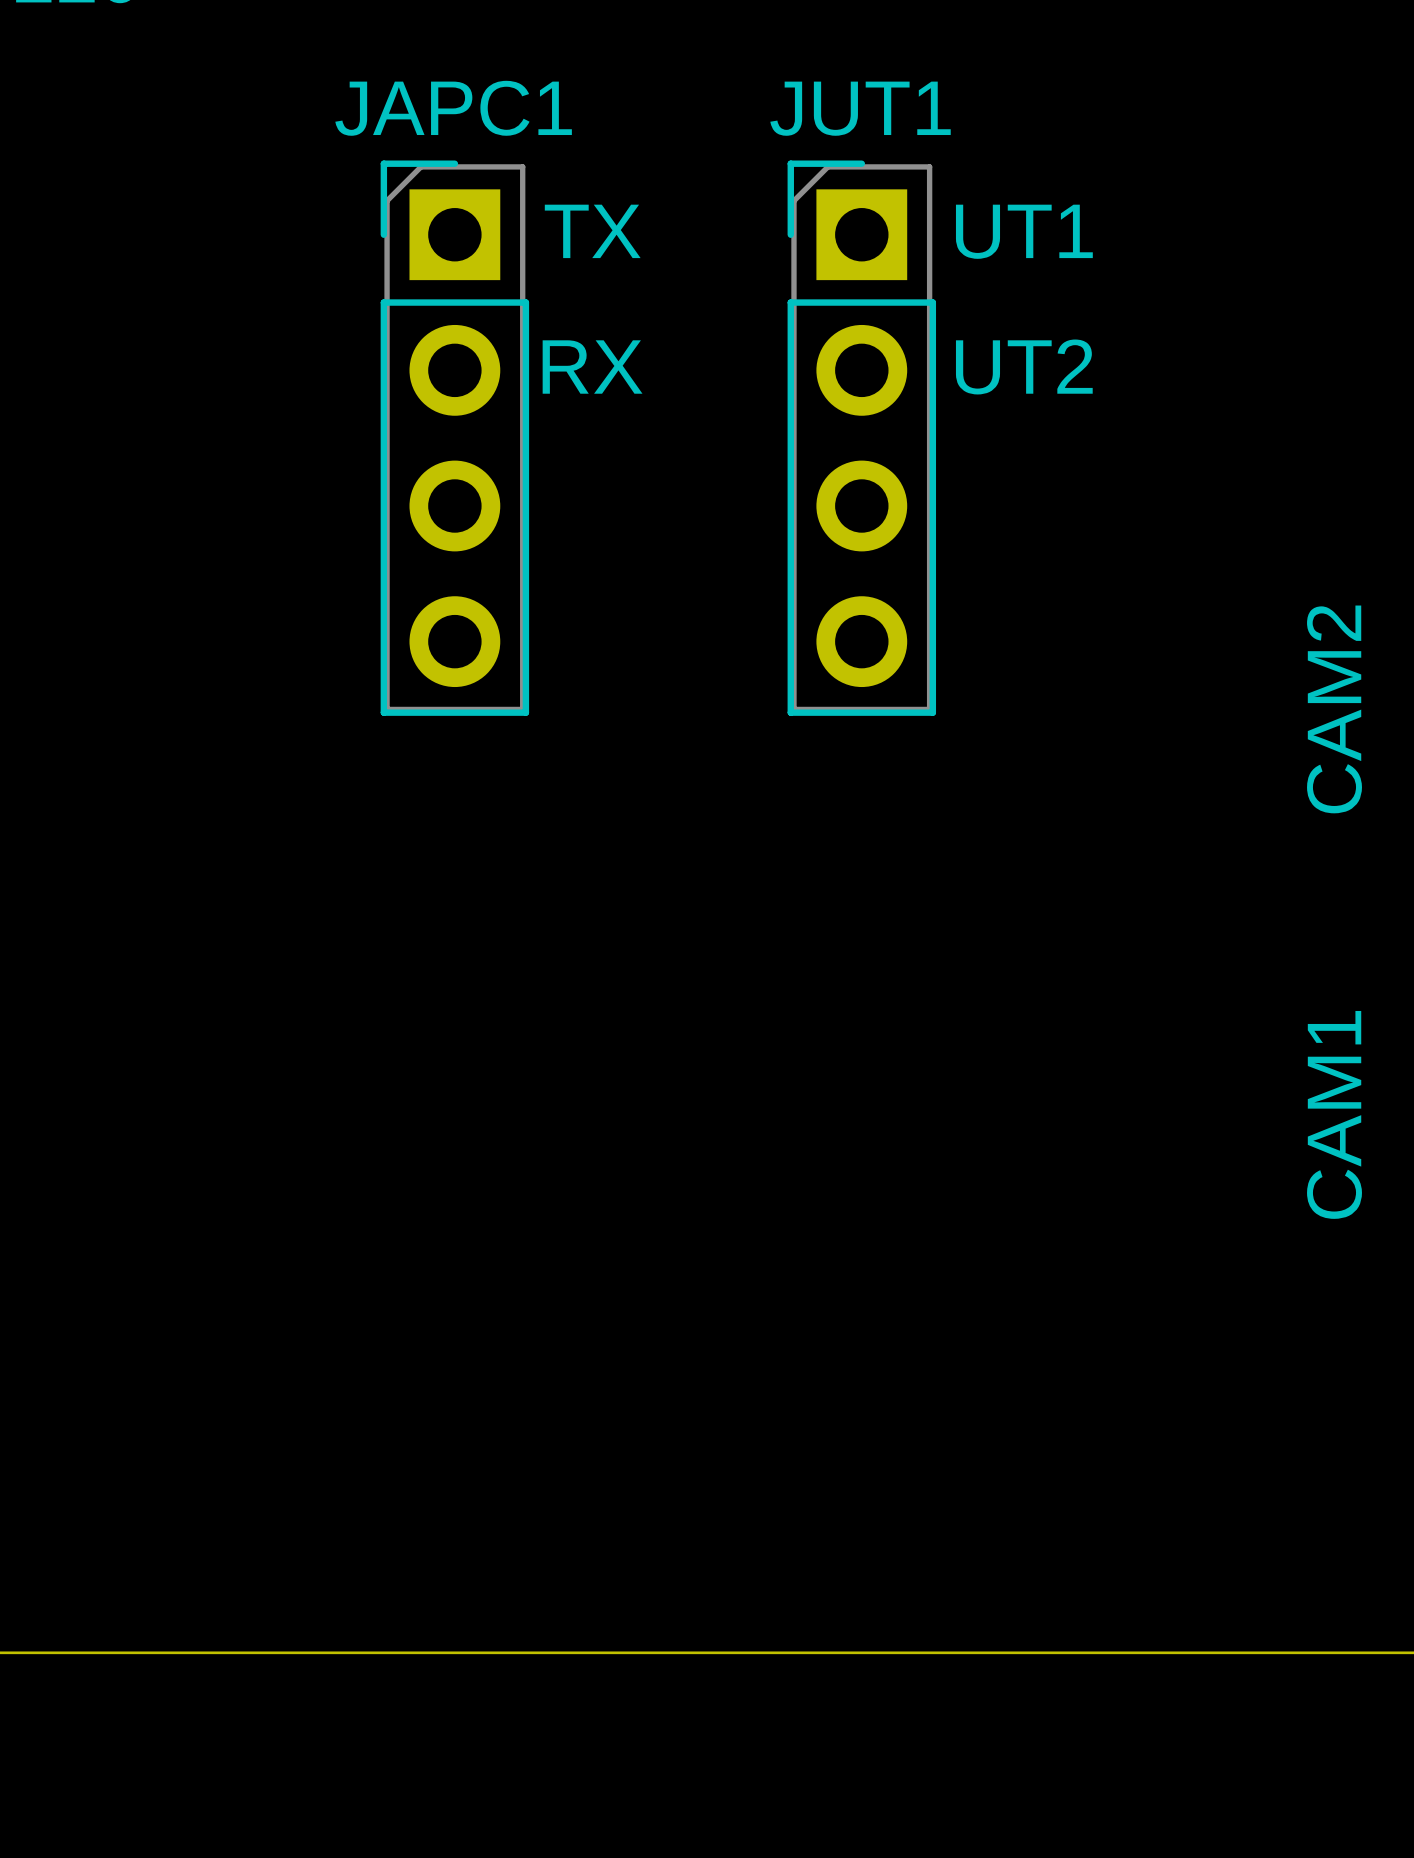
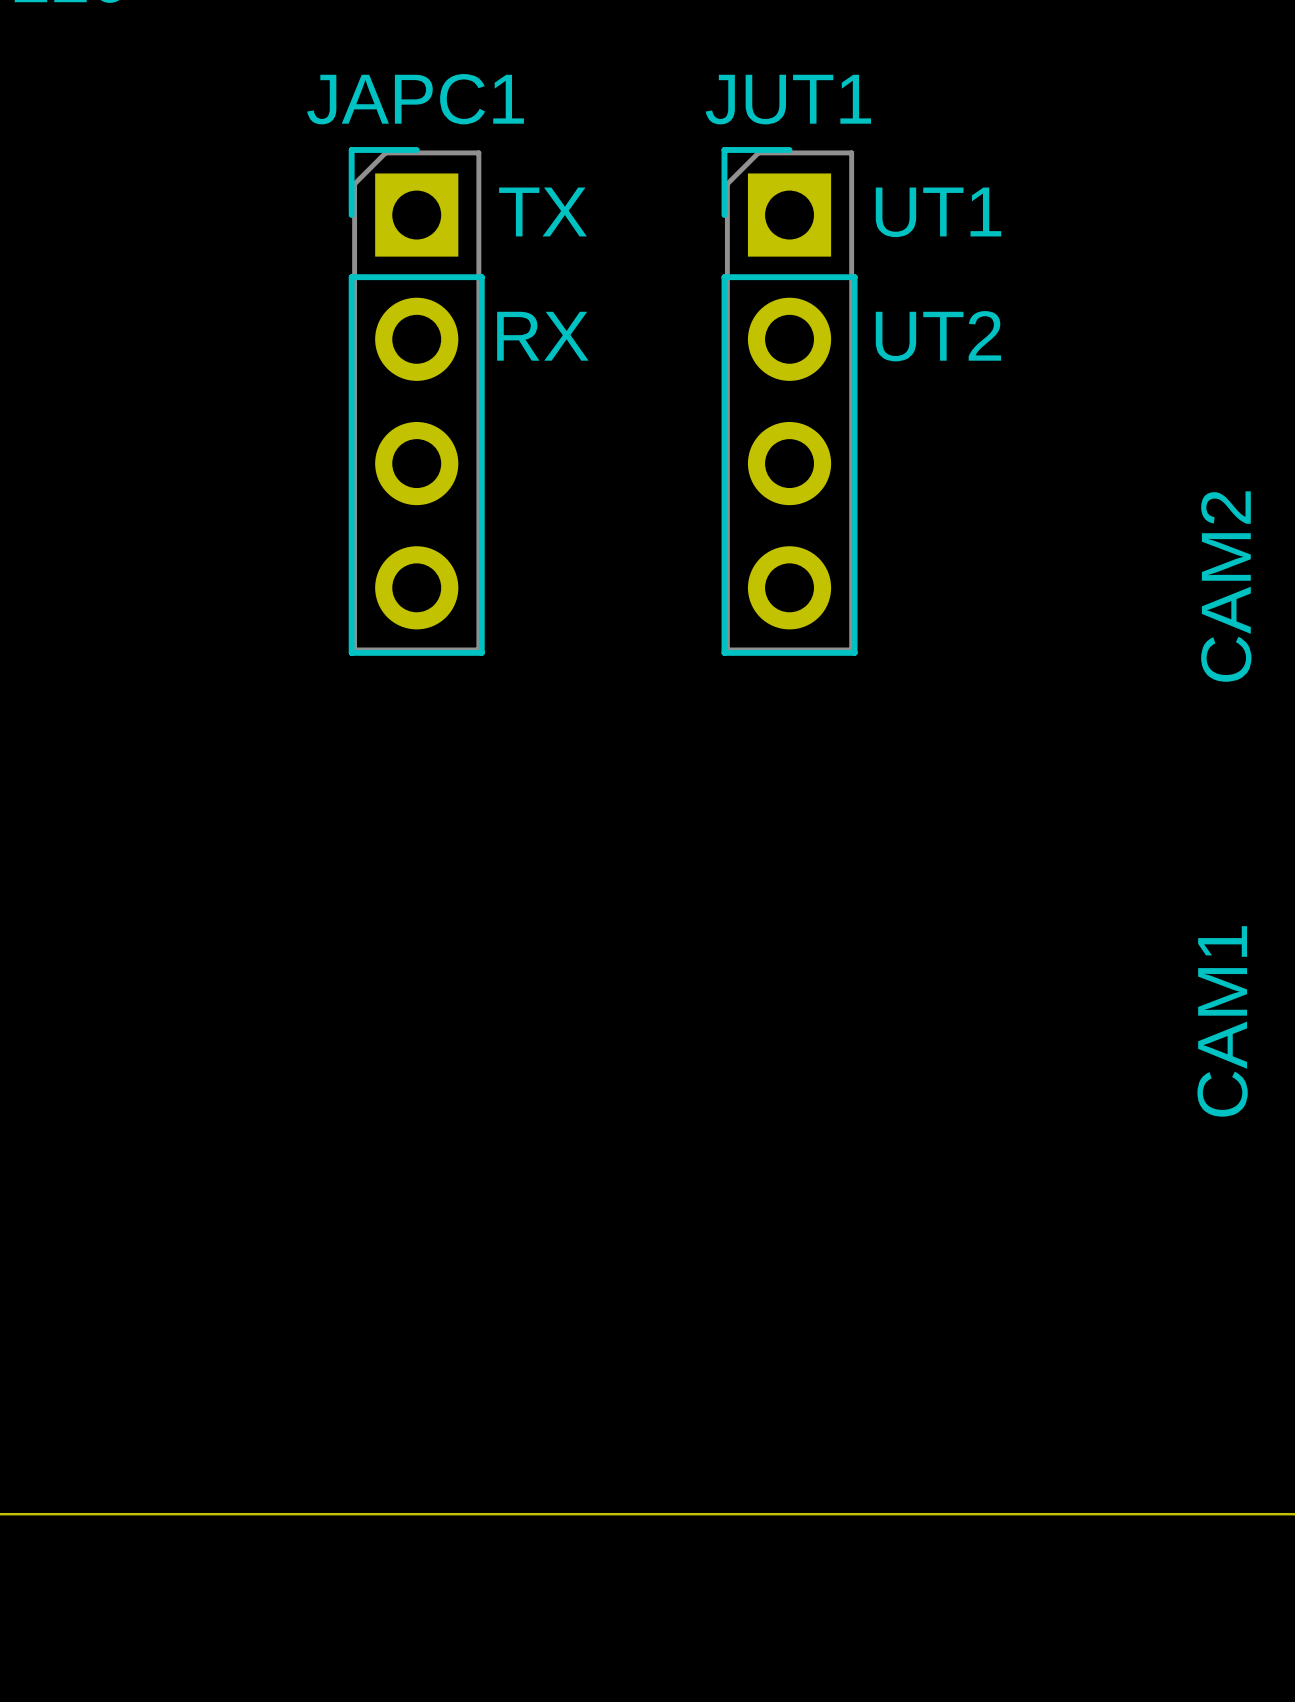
text position: CAM2 (1334, 709) -> CAM2 (1226, 586)

